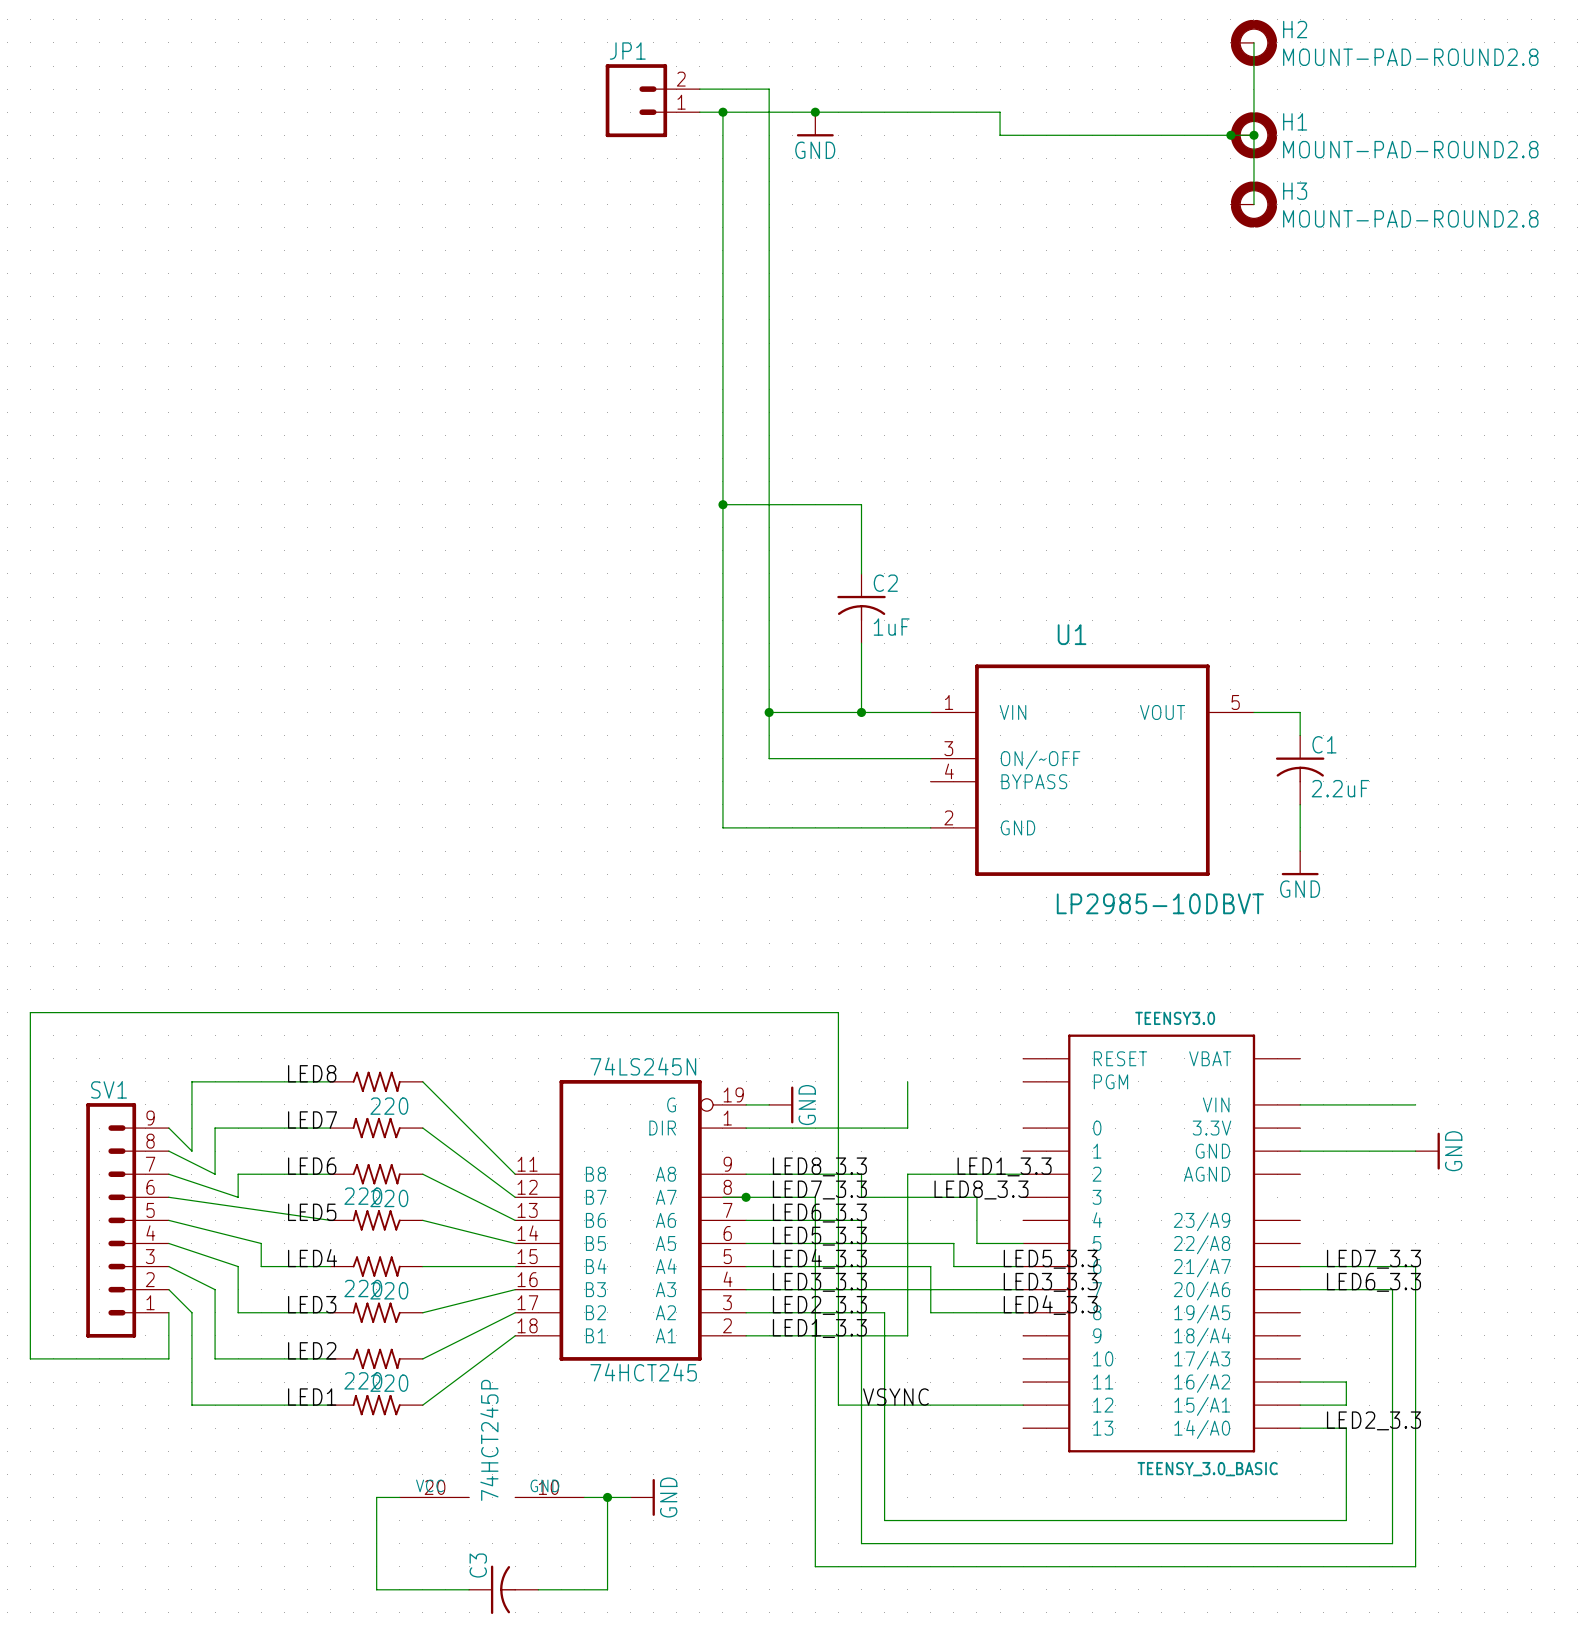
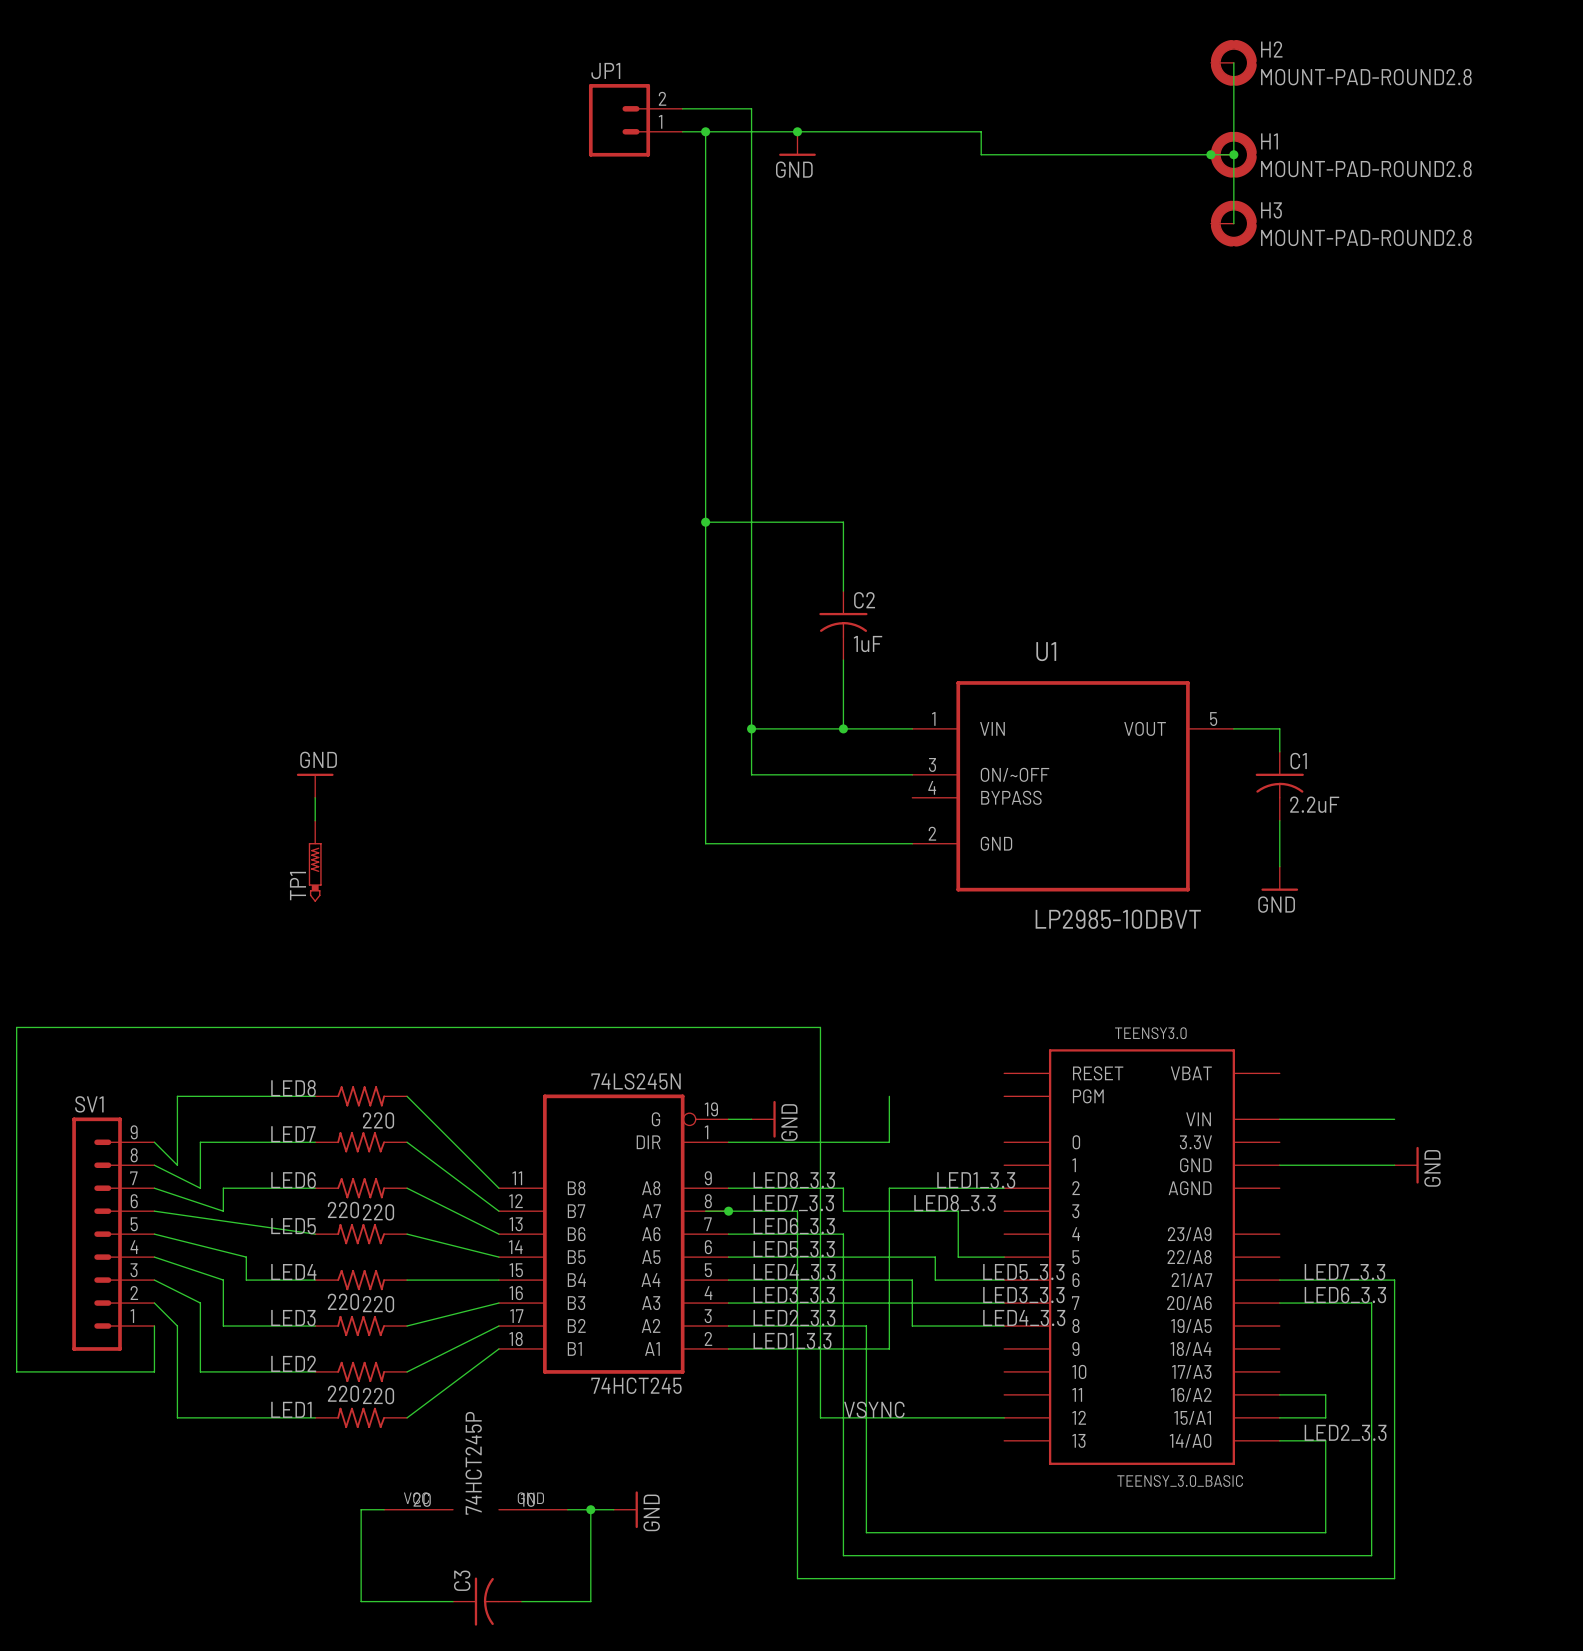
power symbol: none -> GND (315, 785)
wire: none -> (315, 797) (315, 820)
TP1: none -> (315, 861)

